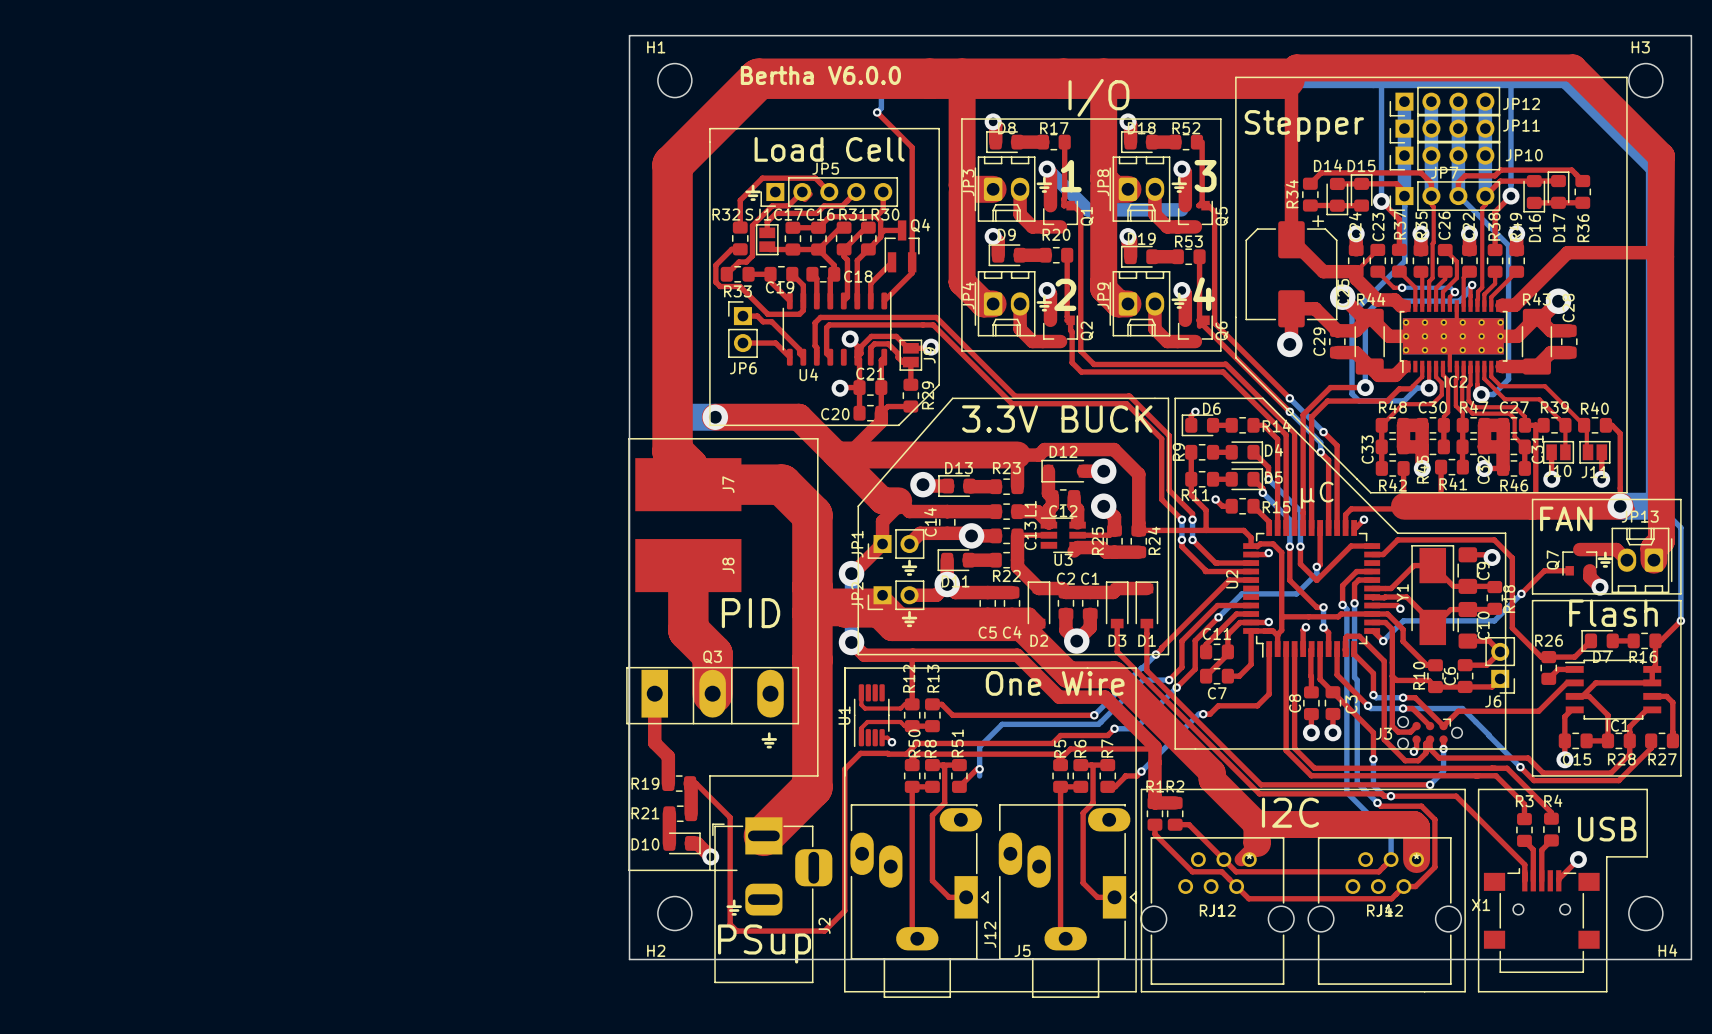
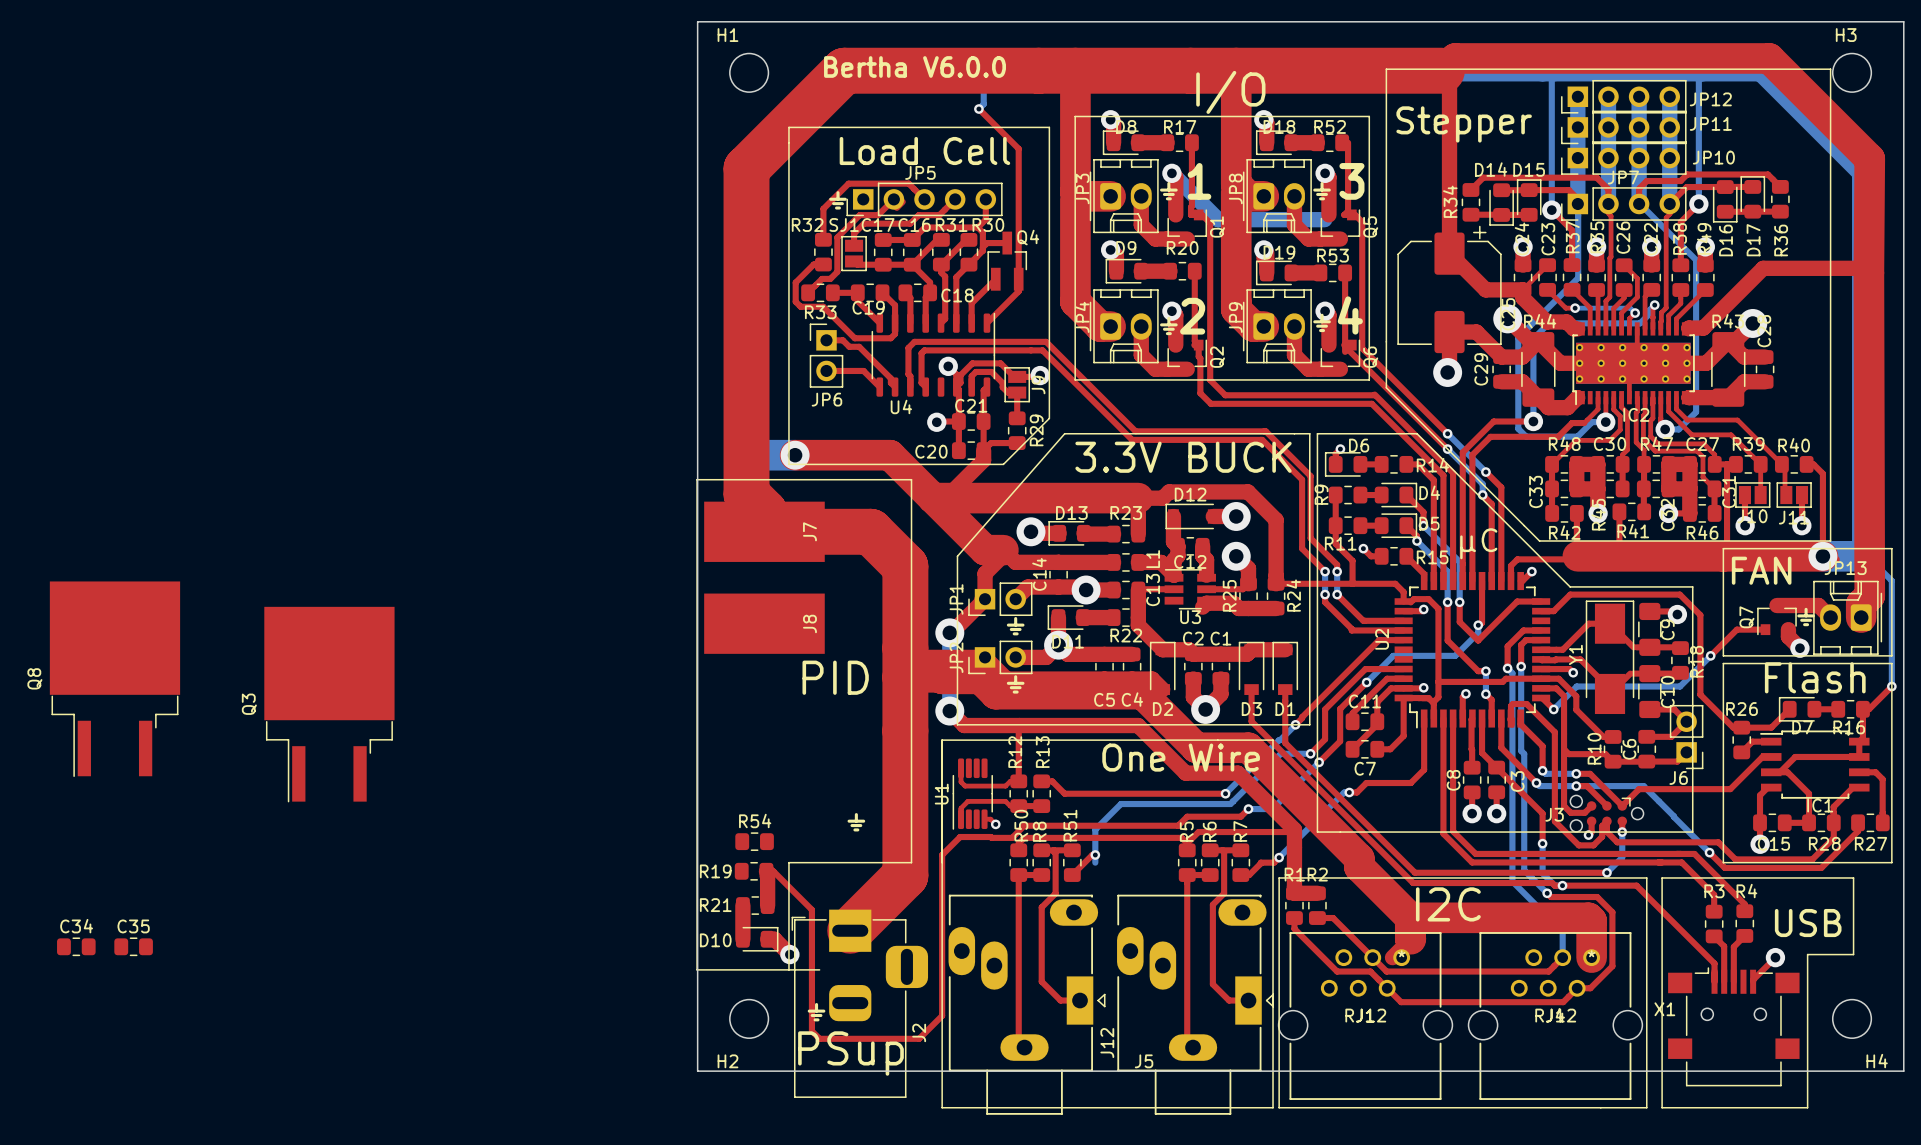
top track: (688, 565) (688, 630) (712, 654) (712, 693) -> none
Q8: none -> (114, 679)
Q3 name position: Q3 (712, 657) -> Q3 (249, 704)
Q3 footprint: [626, 667, 799, 725] -> [264, 606, 395, 803]
top track: (654, 693) (654, 743) (668, 756) (668, 783) -> none
R54: none -> (754, 841)
C34: none -> (76, 946)
C35: none -> (133, 946)

